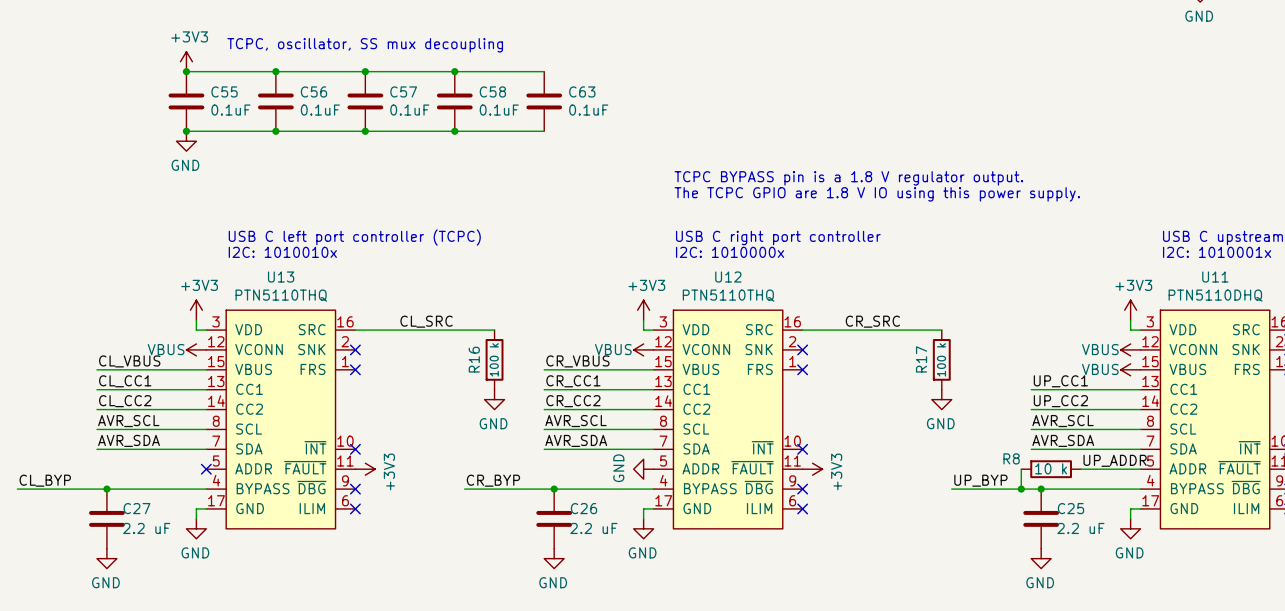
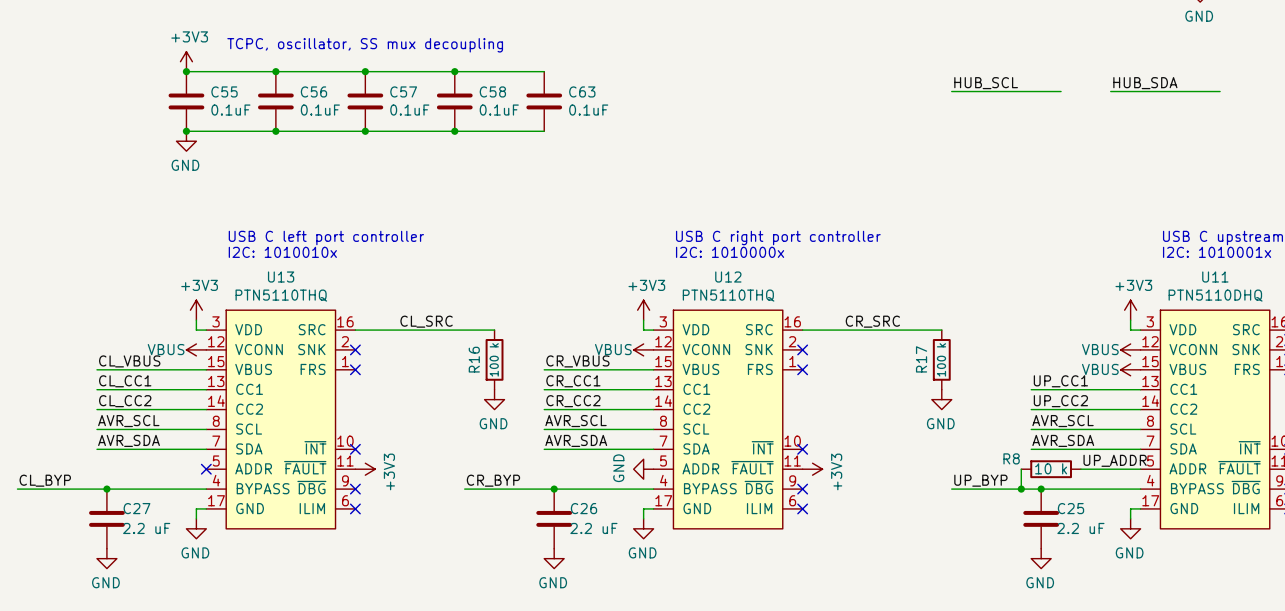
label: none -> HUB_SCL (986, 83)
label: none -> HUB_SDA (1145, 83)
wire: none -> (951, 91) (1061, 91)
wire: none -> (1110, 91) (1220, 91)
text: TCPC BYPASS pin is a 1.8 V regulator output. (848, 178) -> none
text: The TCPC GPIO are 1.8 V IO using this power supply. (877, 194) -> none
text: USB C left port controller (TCPC) (354, 237) -> USB C left port controller (326, 238)

